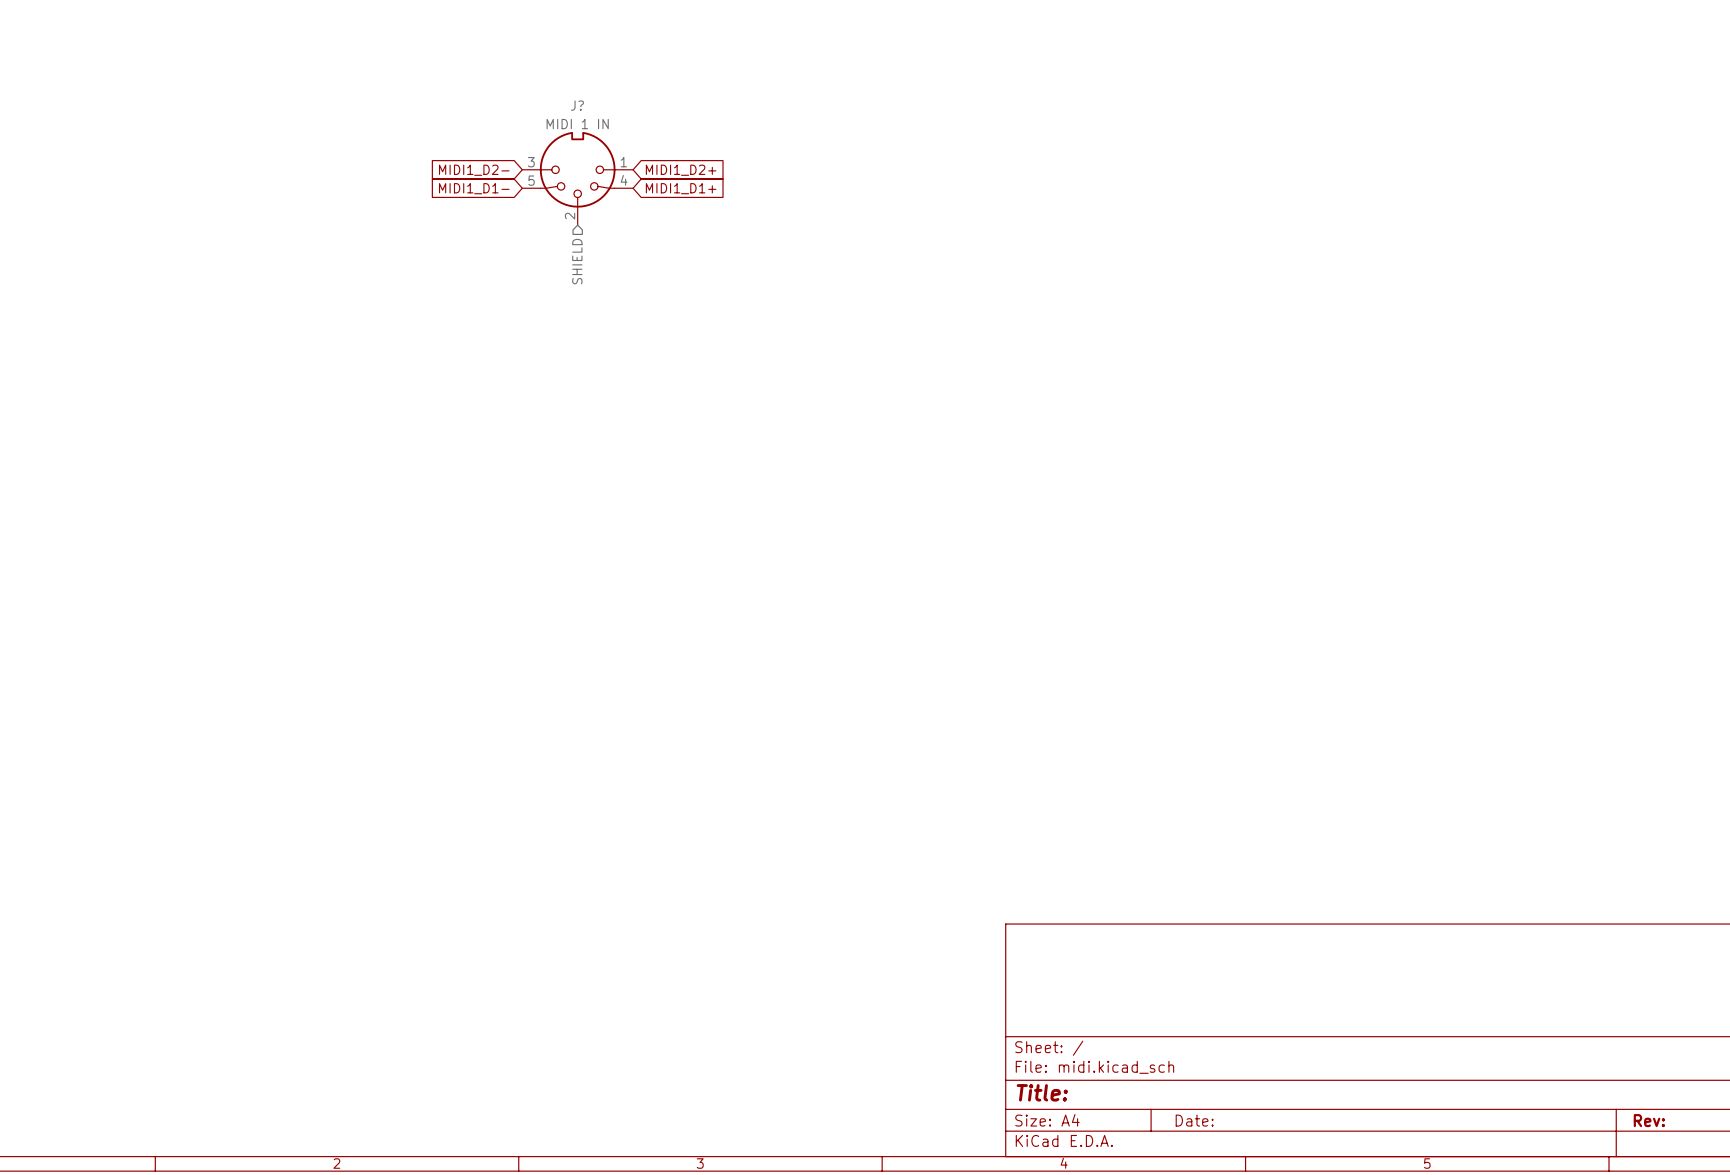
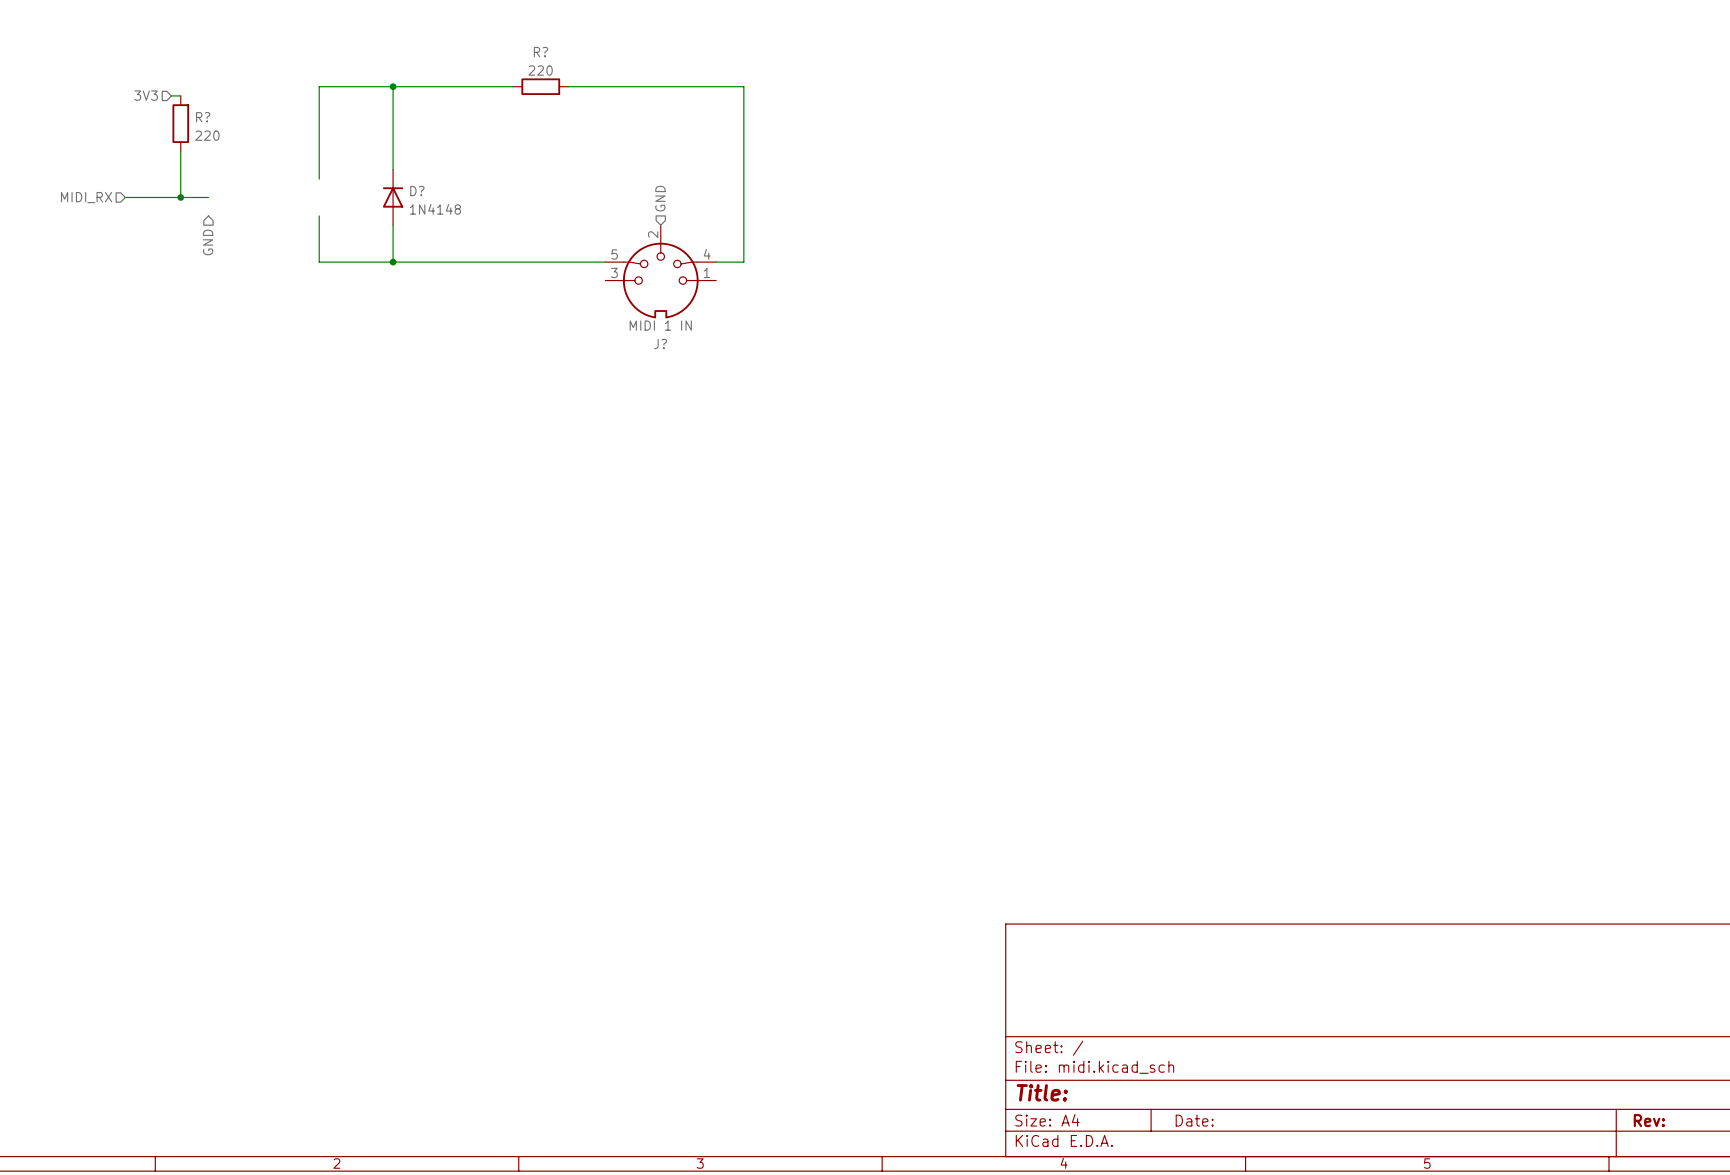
wire: none -> (393, 86) (393, 169)
junction: none -> (393, 86)
wire: none -> (513, 86) (319, 86) (319, 179)
R?: none -> 220 (540, 86)
wire: none -> (568, 86) (743, 86) (743, 262) (716, 262)
hierarchical label: none -> 3V3 (146, 95)
wire: none -> (171, 95) (180, 95)
R?: none -> 220 (180, 123)
wire: none -> (180, 151) (180, 197)
global label: MIDI1_D2- (474, 170) -> none
global label: MIDI1_D2+ (681, 170) -> none
J?: MIDI 1 IN (577, 178) -> none
global label: MIDI1_D1- (474, 188) -> none
global label: MIDI1_D1+ (681, 188) -> none
hierarchical label: none -> MIDI_RX (86, 197)
wire: none -> (125, 197) (208, 197)
junction: none -> (180, 197)
D?: none -> 1N4148 (393, 197)
hierarchical label: none -> GND (660, 198)
wire: none -> (319, 215) (319, 262) (605, 262)
wire: none -> (393, 225) (393, 262)
hierarchical label: none -> GND (208, 242)
hierarchical label: SHIELD (577, 261) -> none
junction: none -> (393, 262)
J?: none -> MIDI 1 IN (660, 271)

